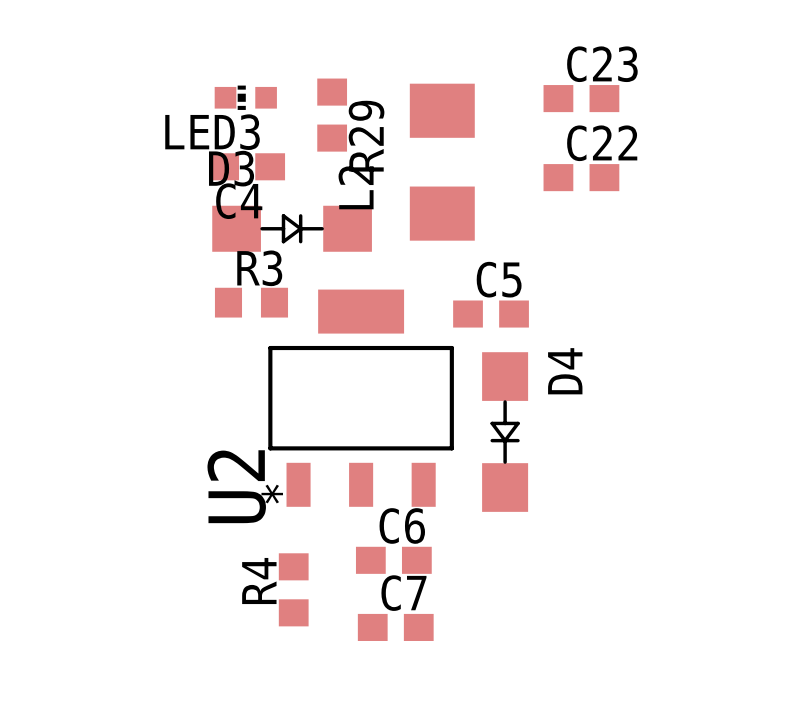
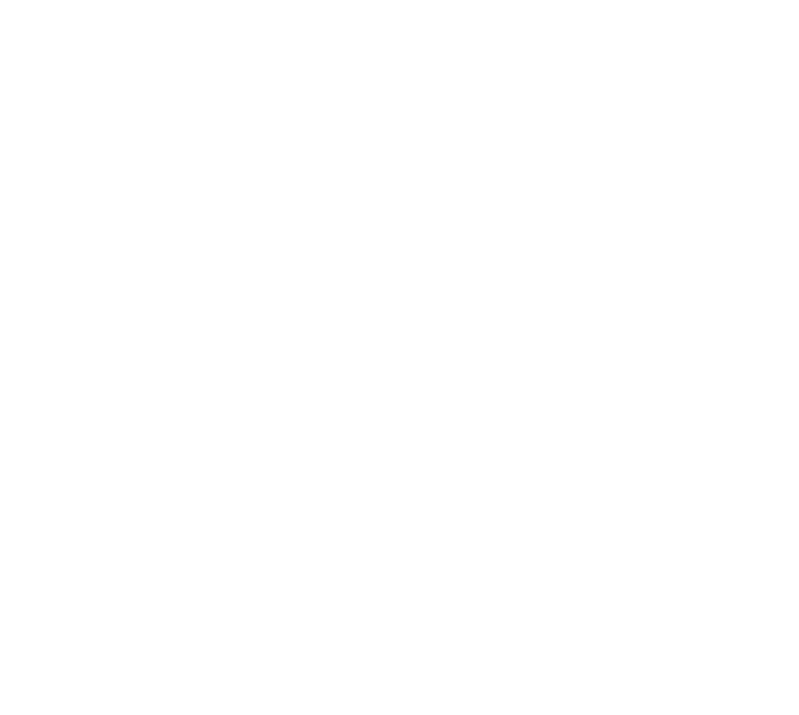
LED3: (245, 97) -> none
C23: (581, 98) -> none
R29: (332, 115) -> none
L2: (442, 162) -> none
C4: (247, 166) -> none
C22: (581, 177) -> none
D3: (292, 228) -> none
R3: (251, 302) -> none
C5: (491, 314) -> none
U2: (361, 398) -> none
D4: (505, 432) -> none
C6: (393, 560) -> none
R4: (293, 589) -> none
C7: (395, 627) -> none

